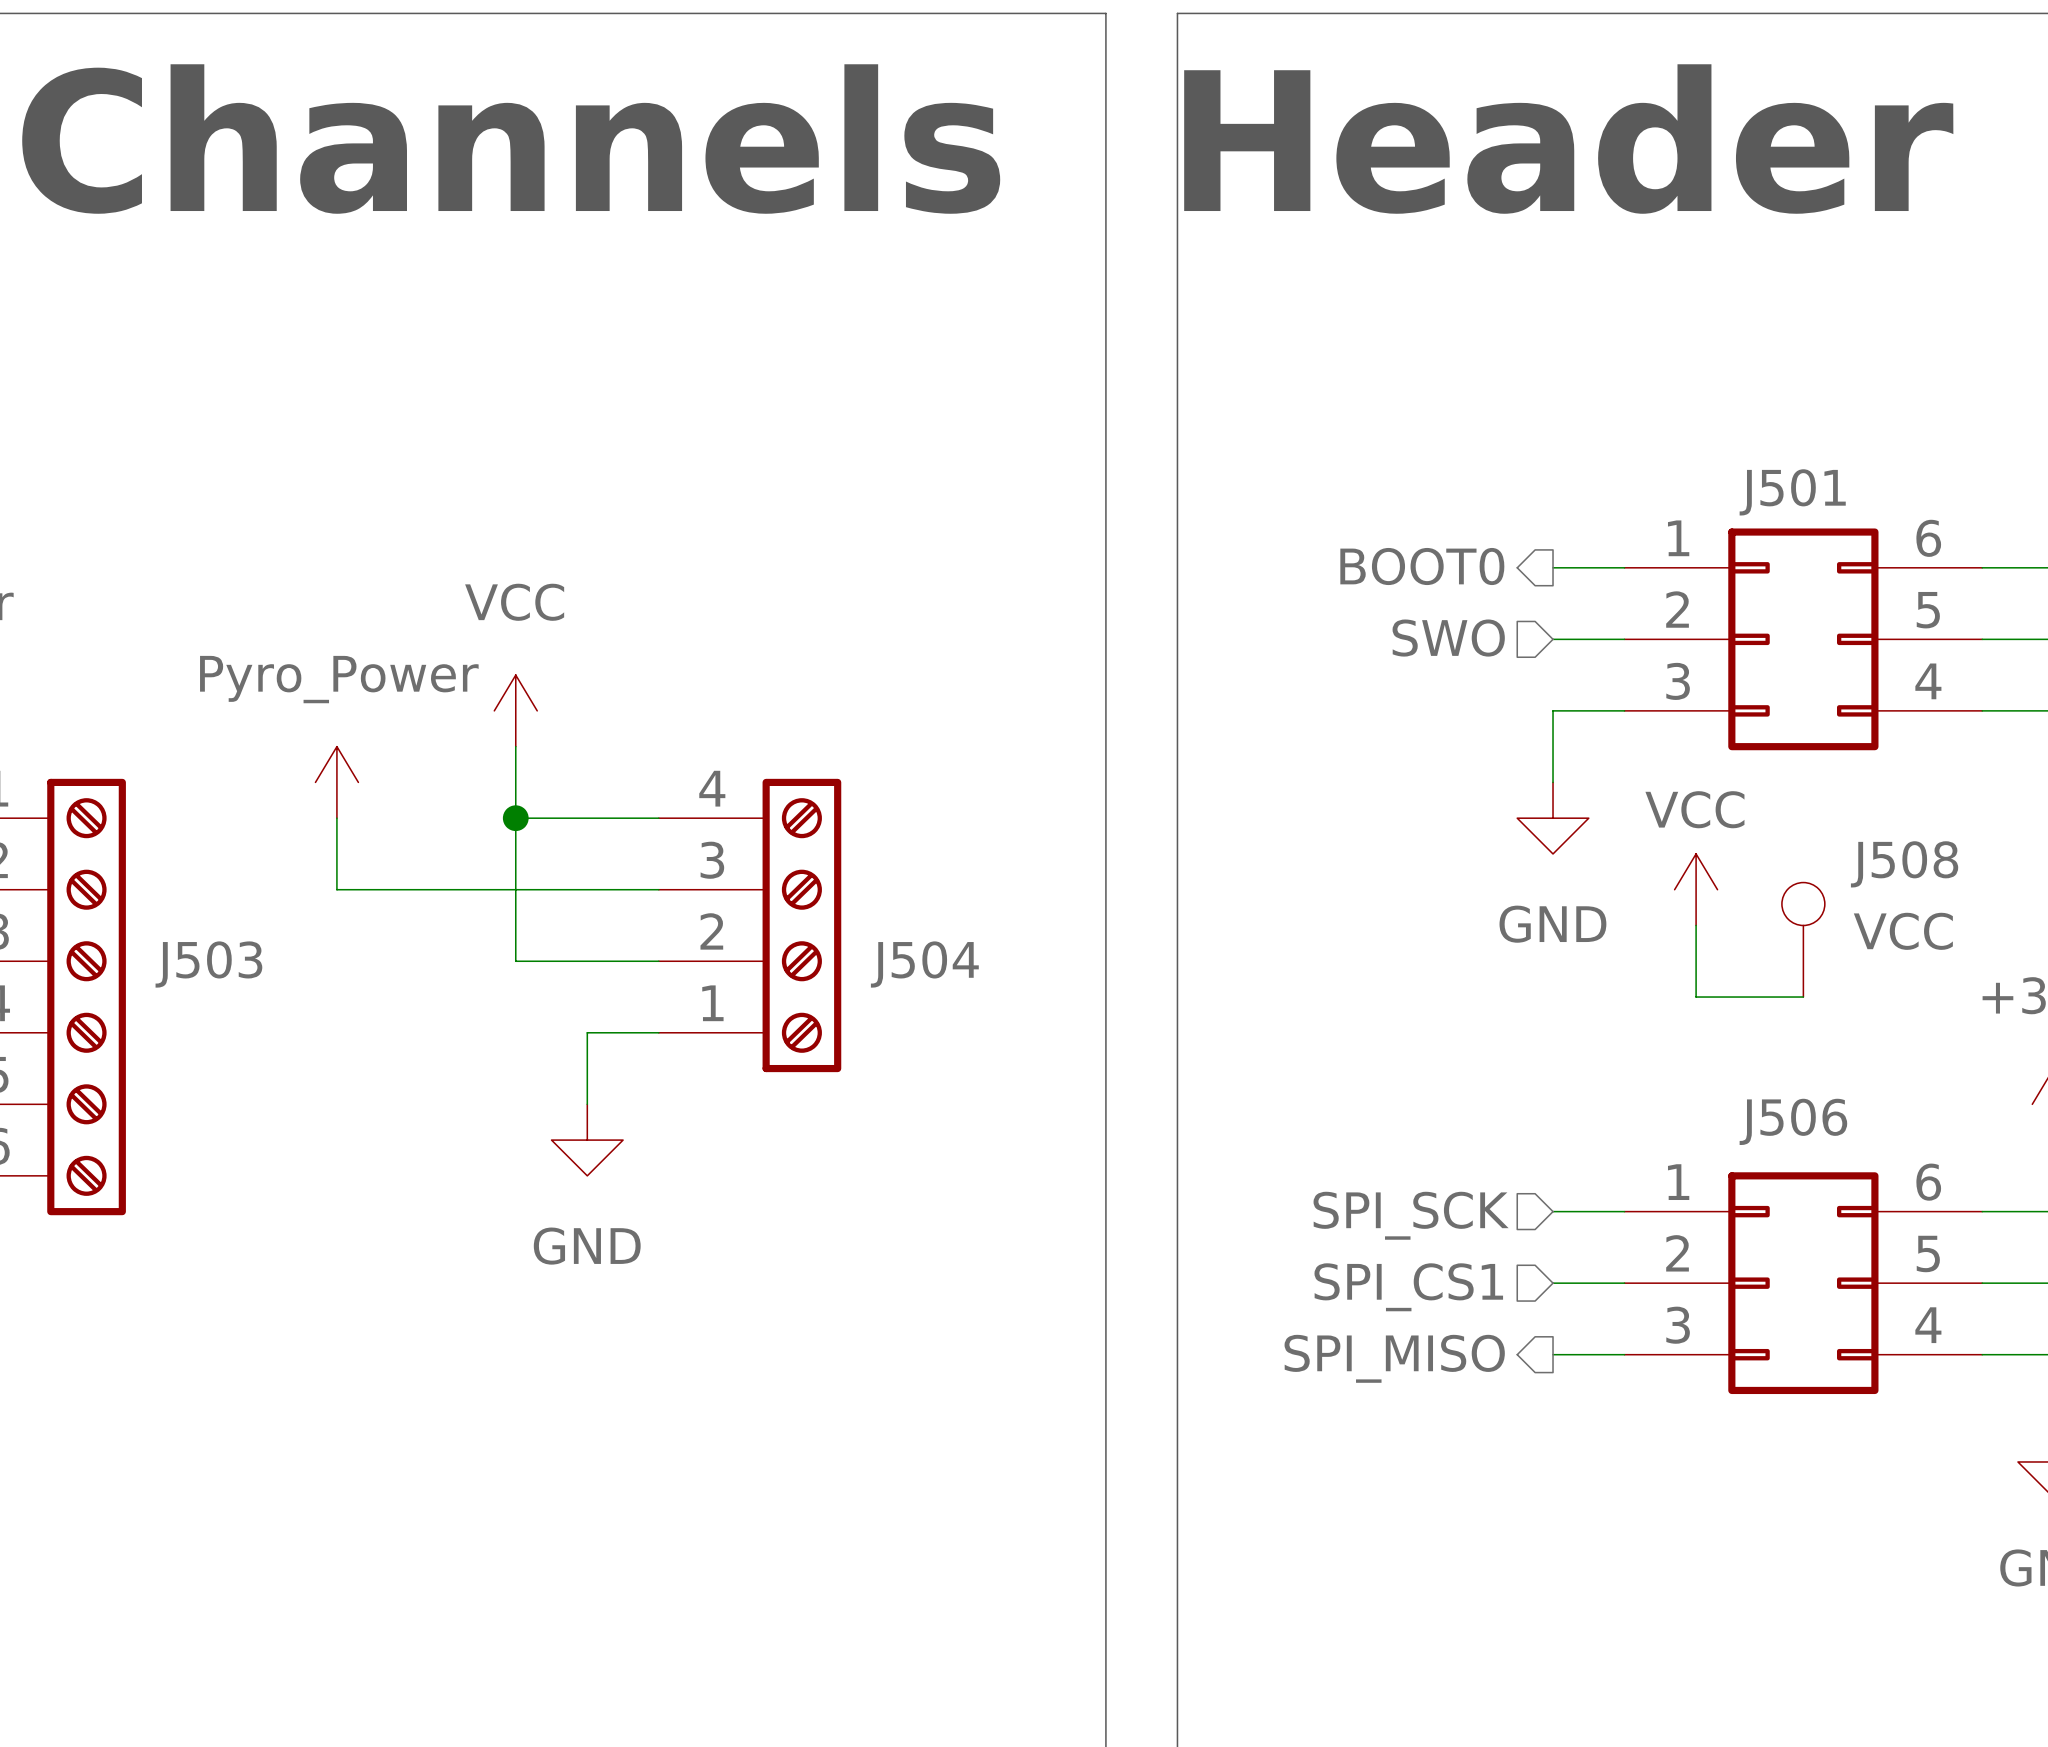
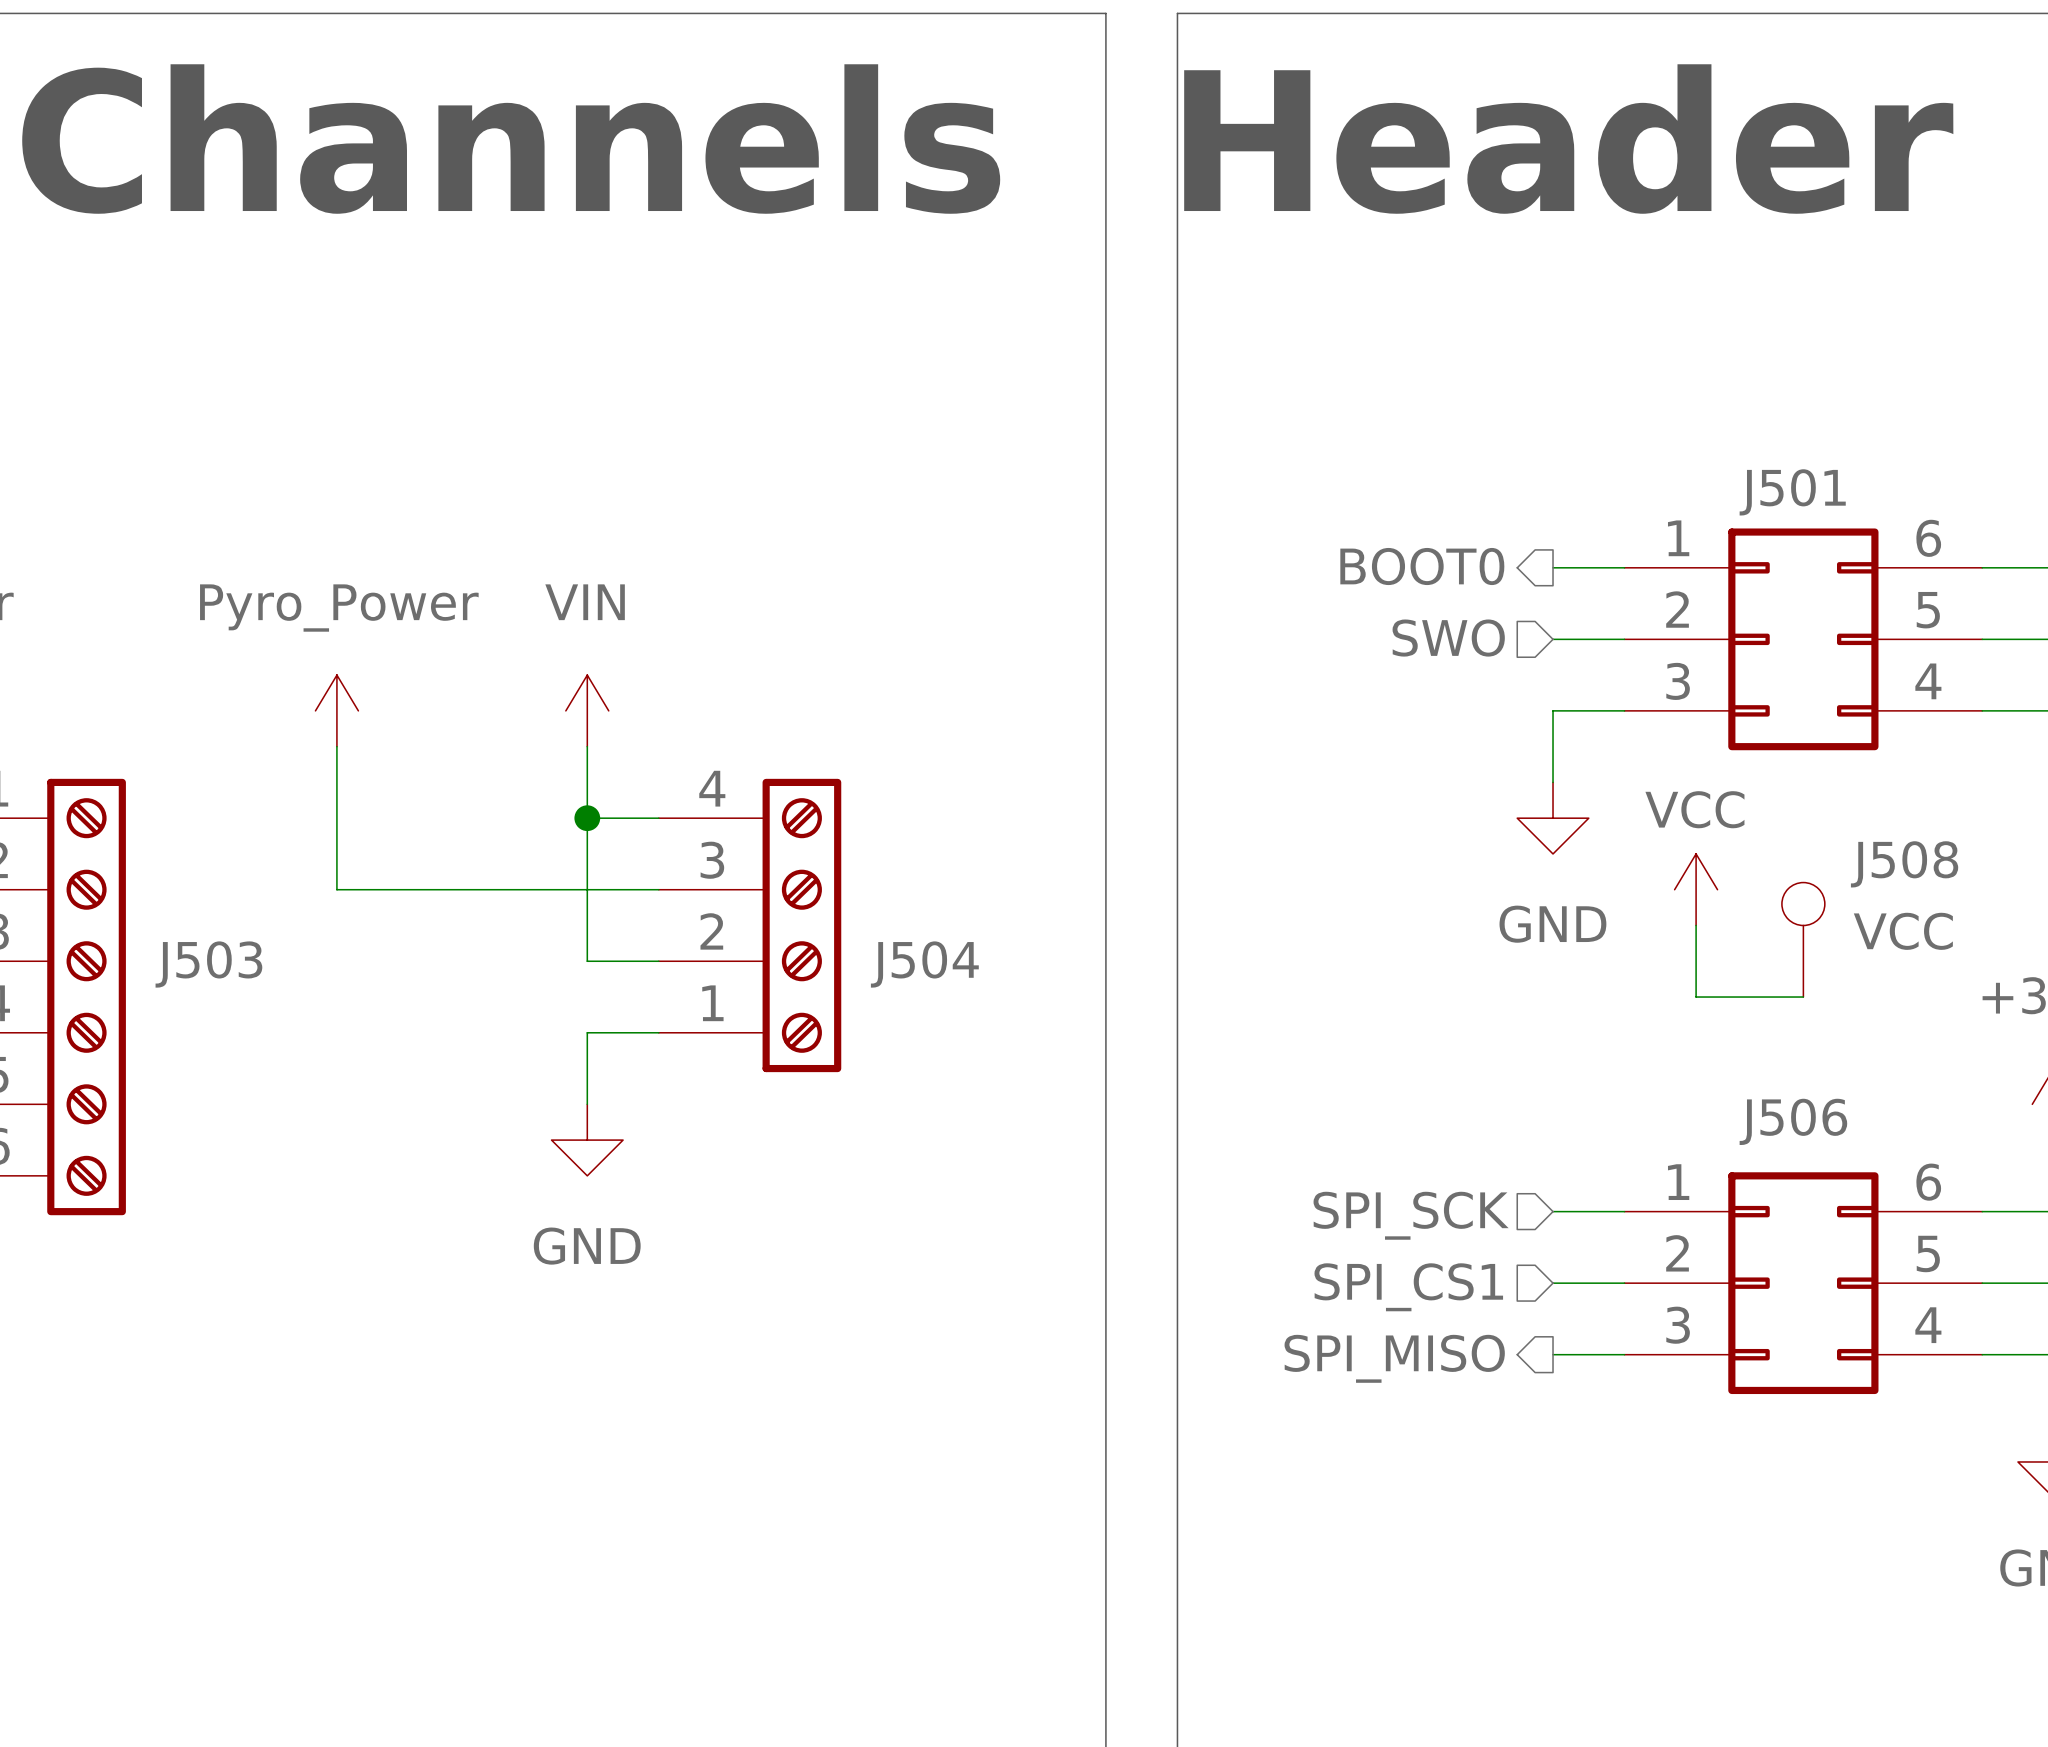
power symbol: VCC (515, 710) -> none
power symbol: none -> VIN (587, 710)
wire: (515, 746) (515, 961) (587, 961) -> (587, 746) (587, 961)
power symbol position: Pyro_Power (336, 782) -> Pyro_Power (336, 710)
wire: (515, 818) (587, 818) -> none
junction position: (515, 818) -> (587, 818)

